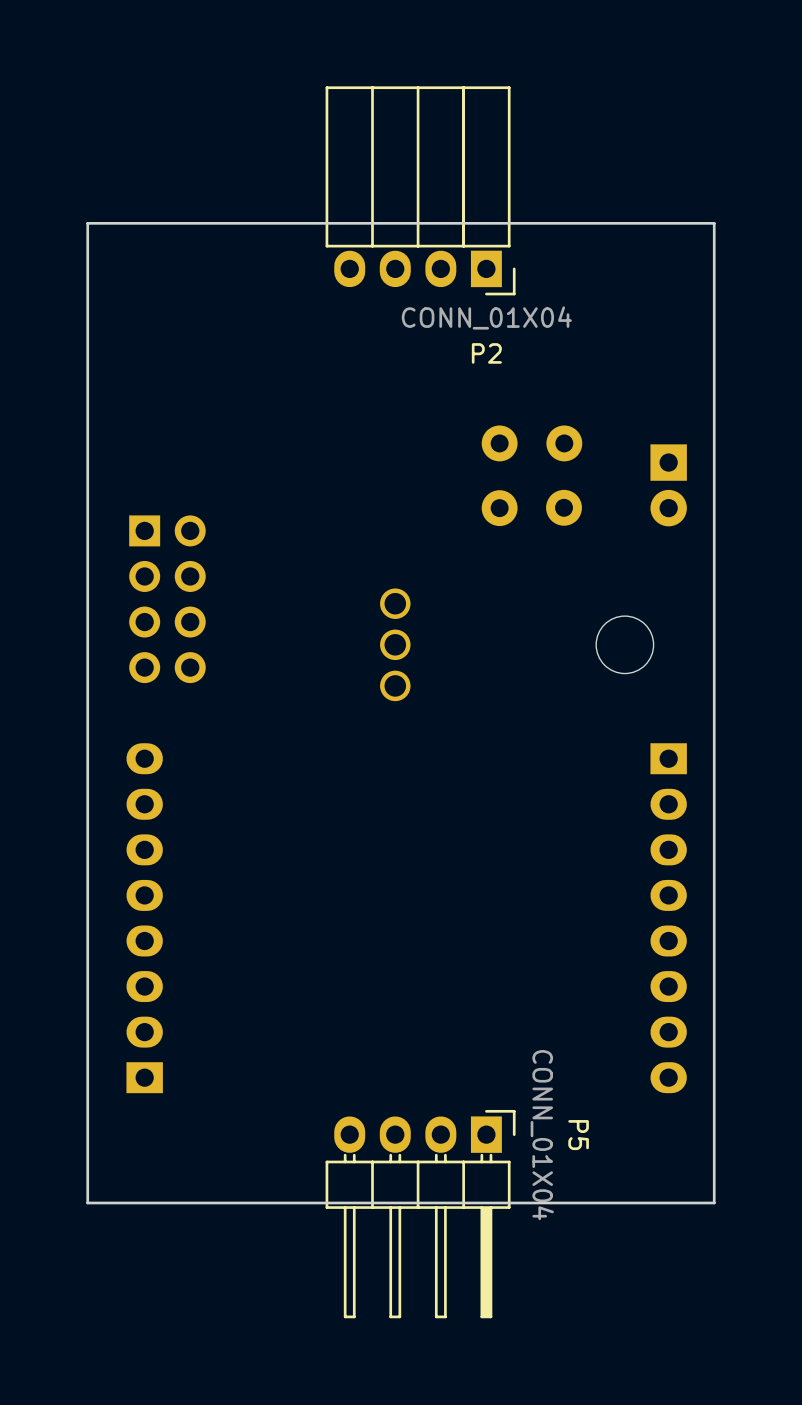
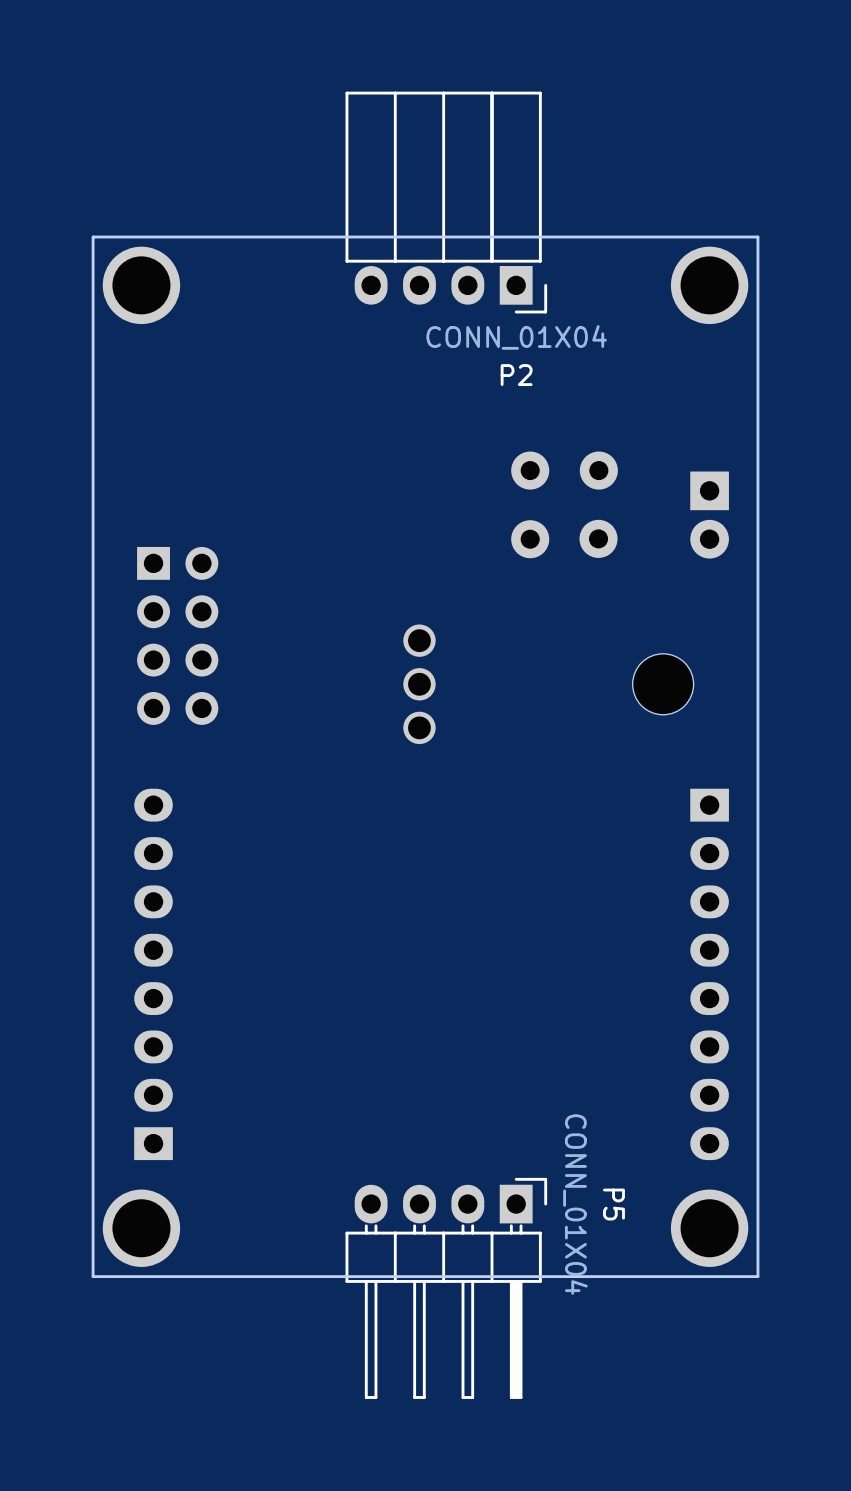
part: none -> (141, 285)
part: none -> (709, 285)
part: none -> (141, 1228)
part: none -> (709, 1228)

